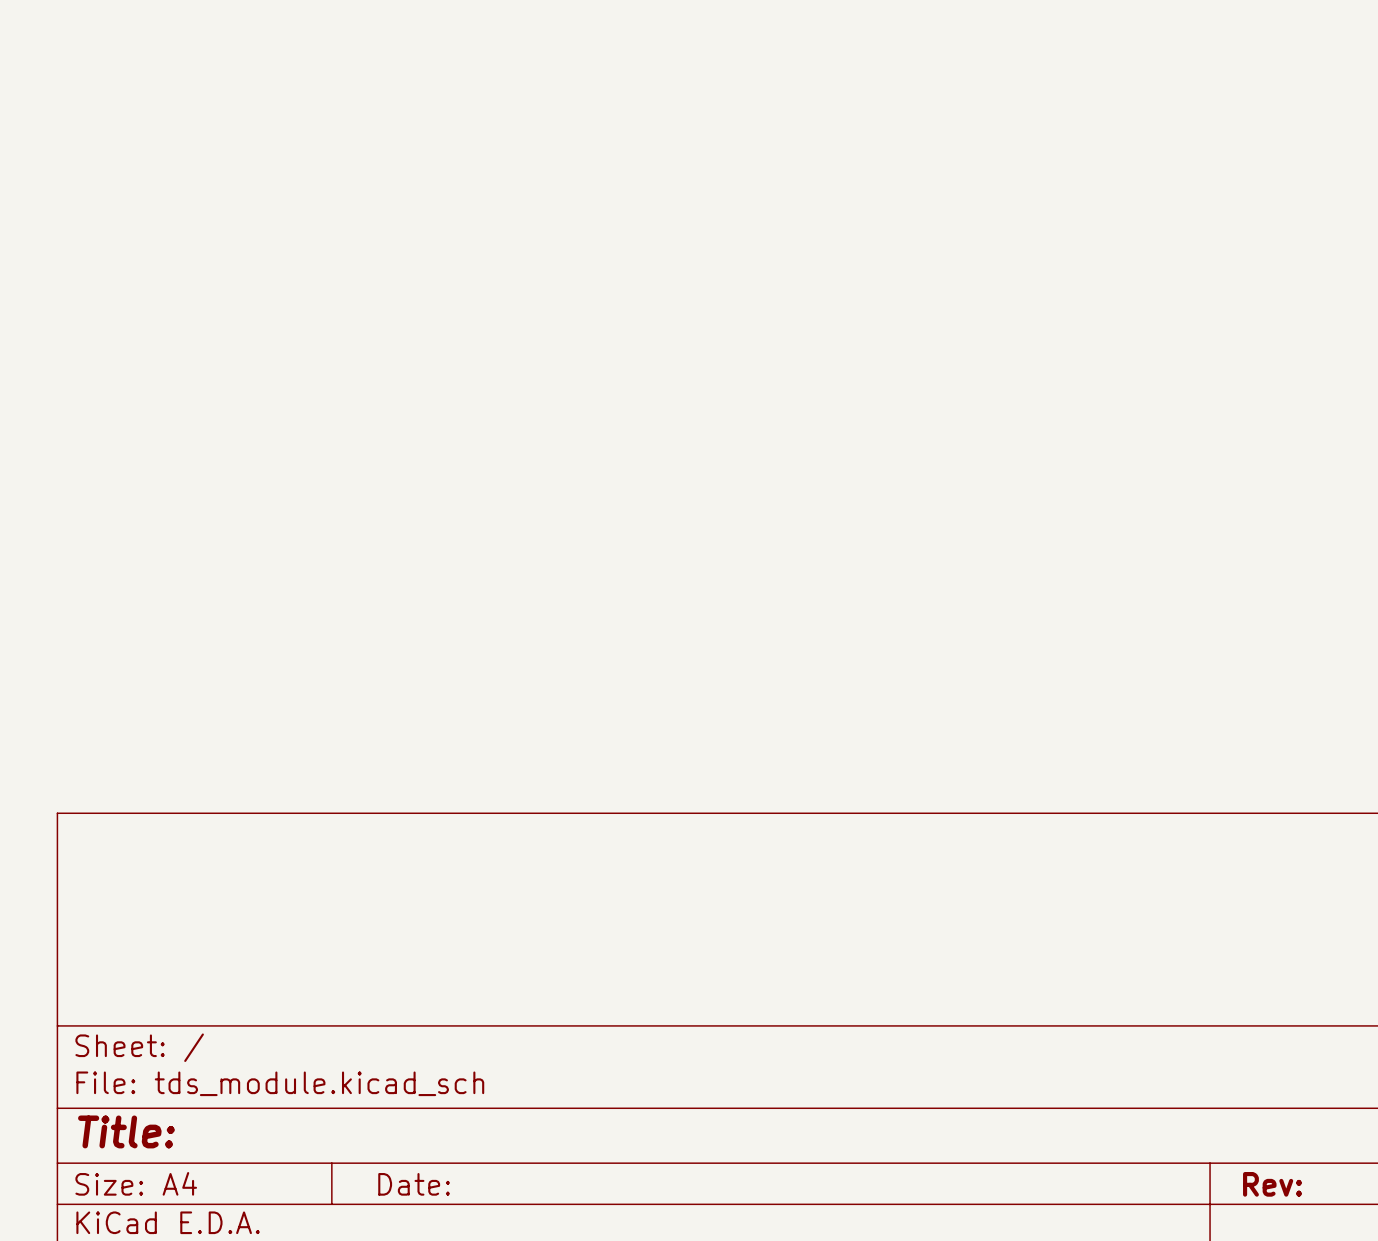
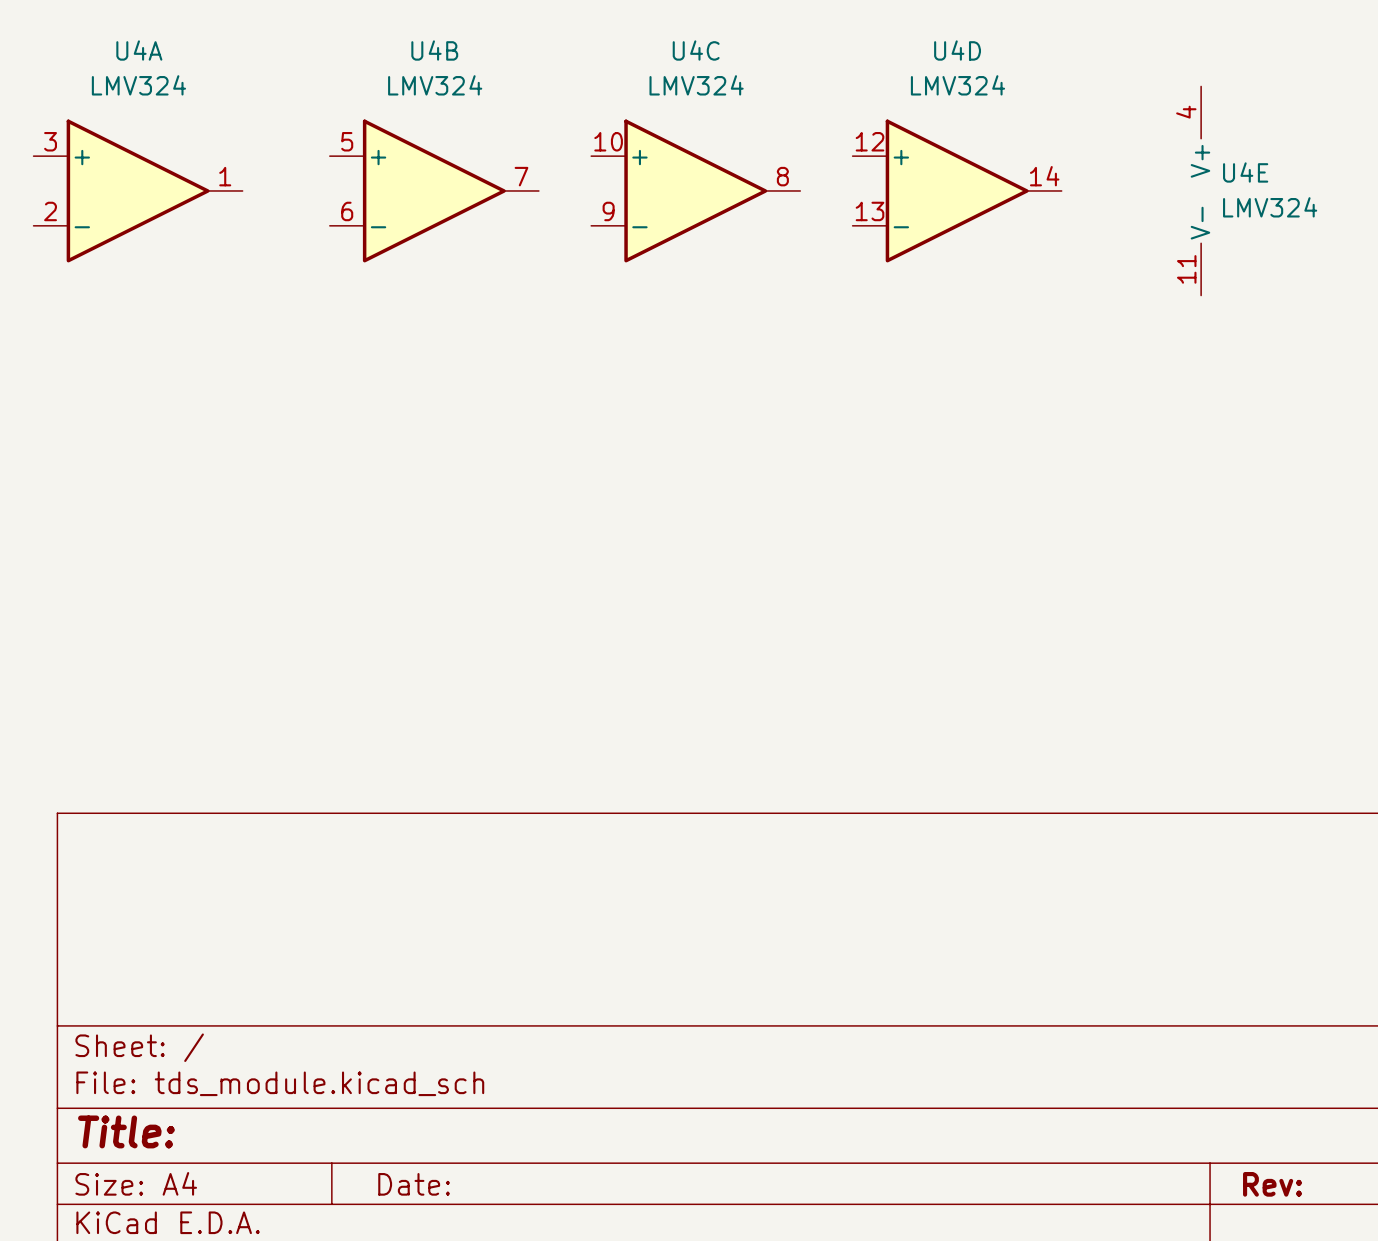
U4A: none -> LMV324 (138, 190)
U4B: none -> LMV324 (434, 190)
U4C: none -> LMV324 (695, 190)
U4D: none -> LMV324 (957, 190)
U4E: none -> LMV324 (1201, 190)

